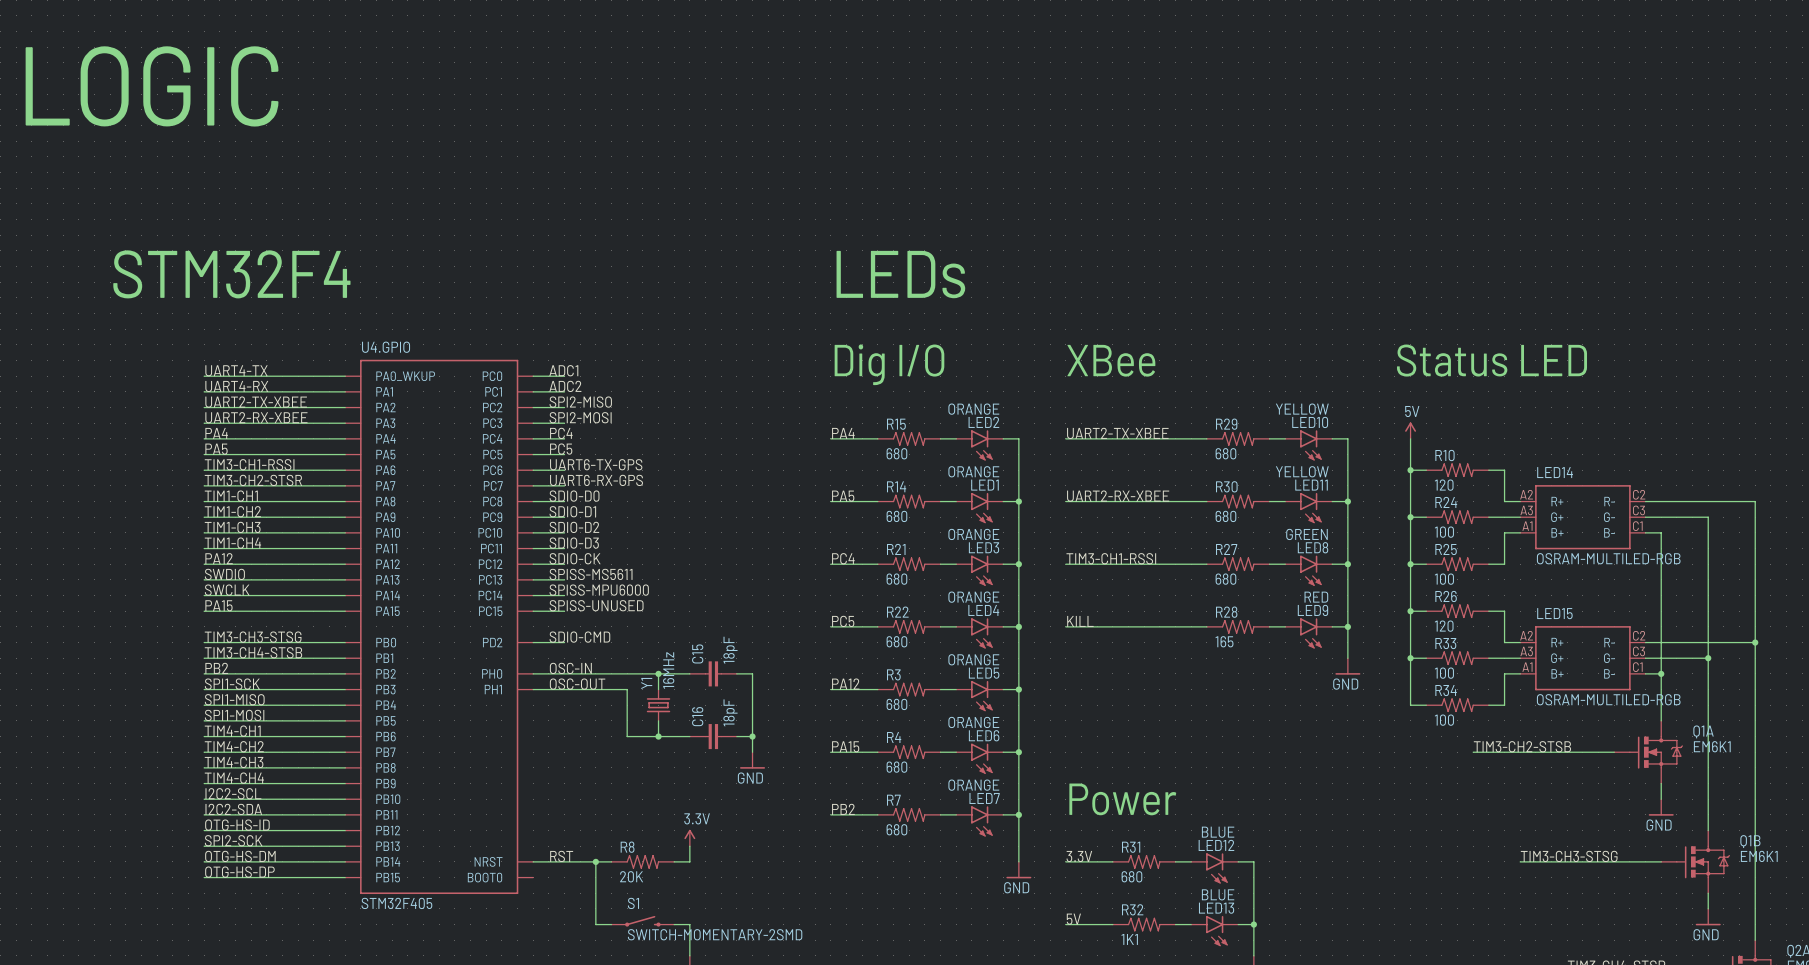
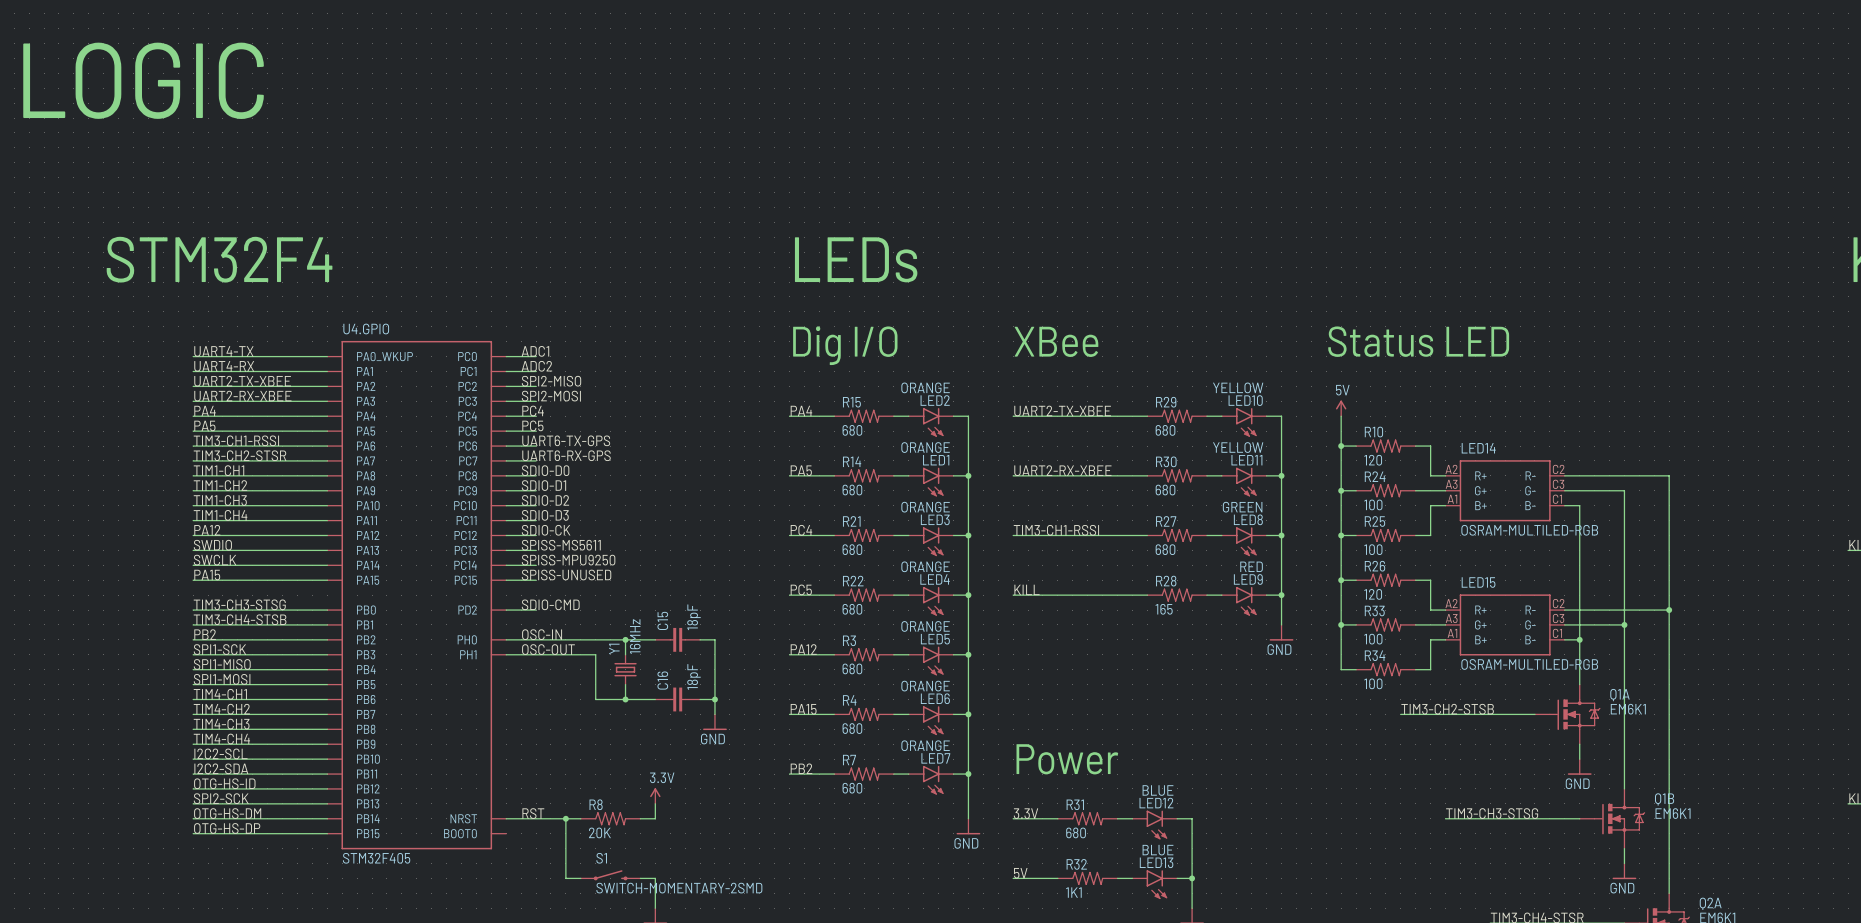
label: SPISS-MPU6000 (599, 590) -> SPISS-MPU9250 (568, 560)

